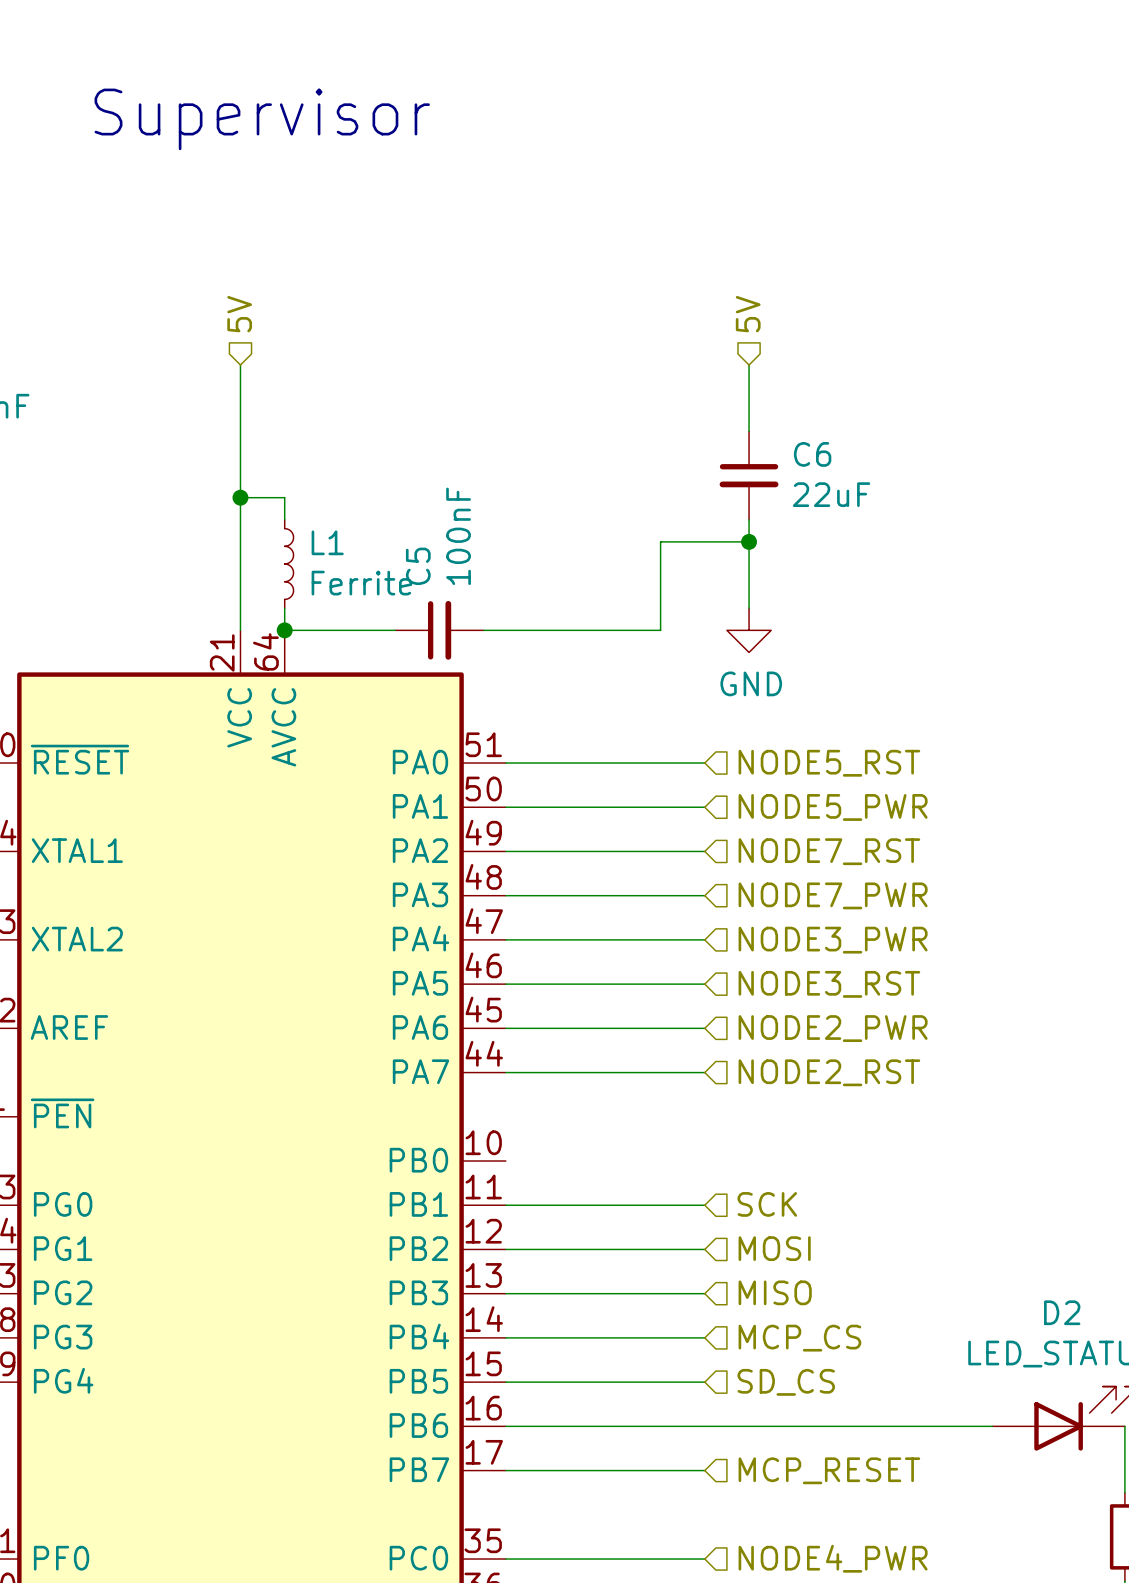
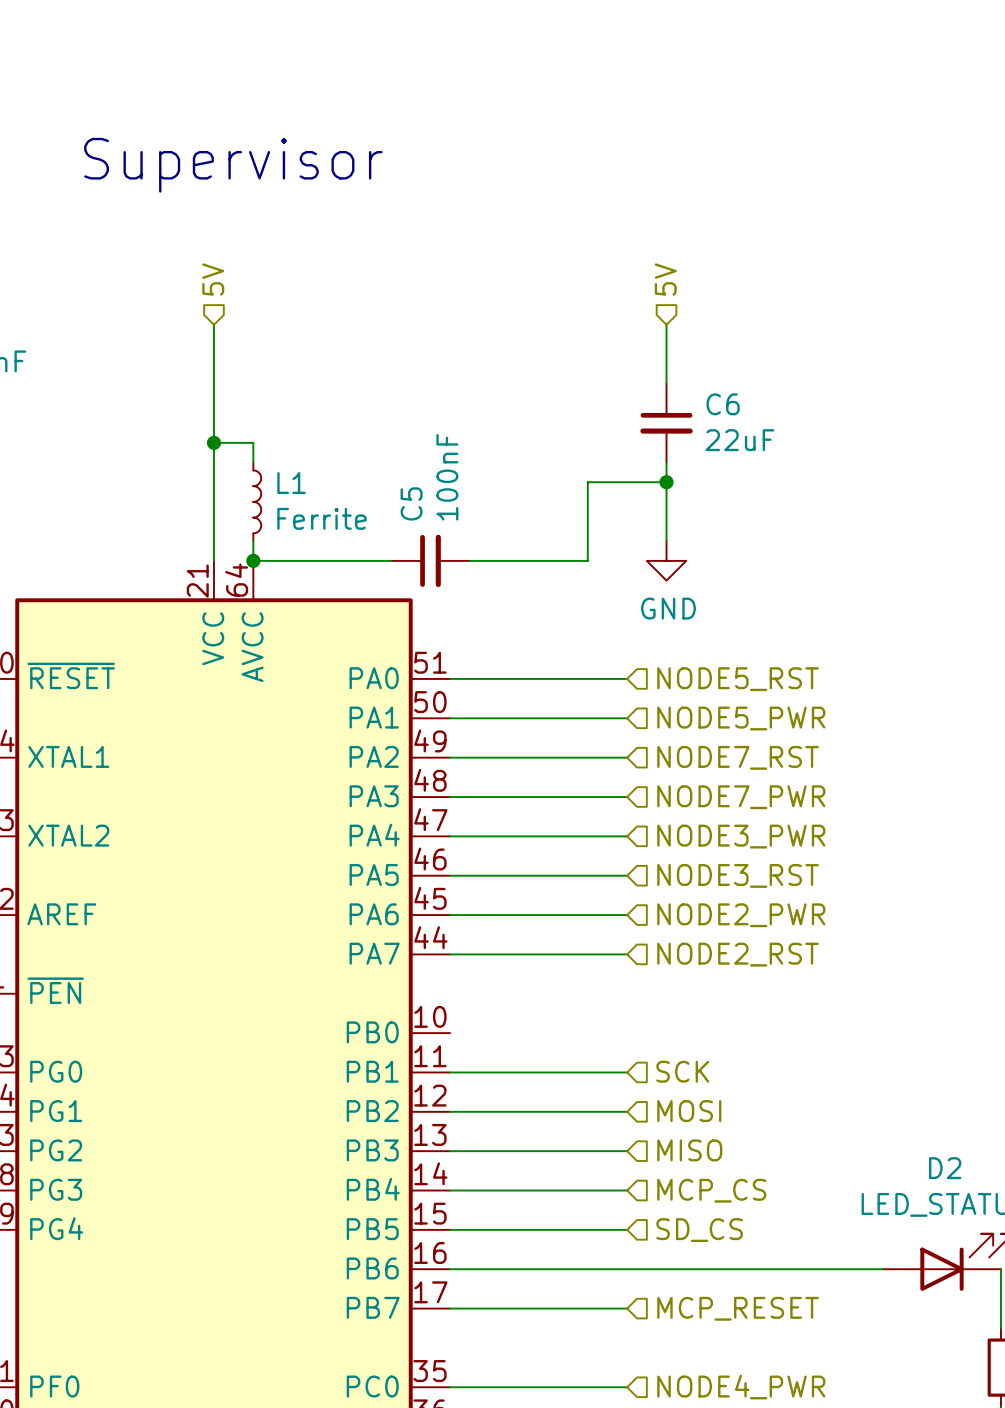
text position: Supervisor (262, 119) -> Supervisor (233, 165)
C5 position: (439, 630) -> (430, 560)

